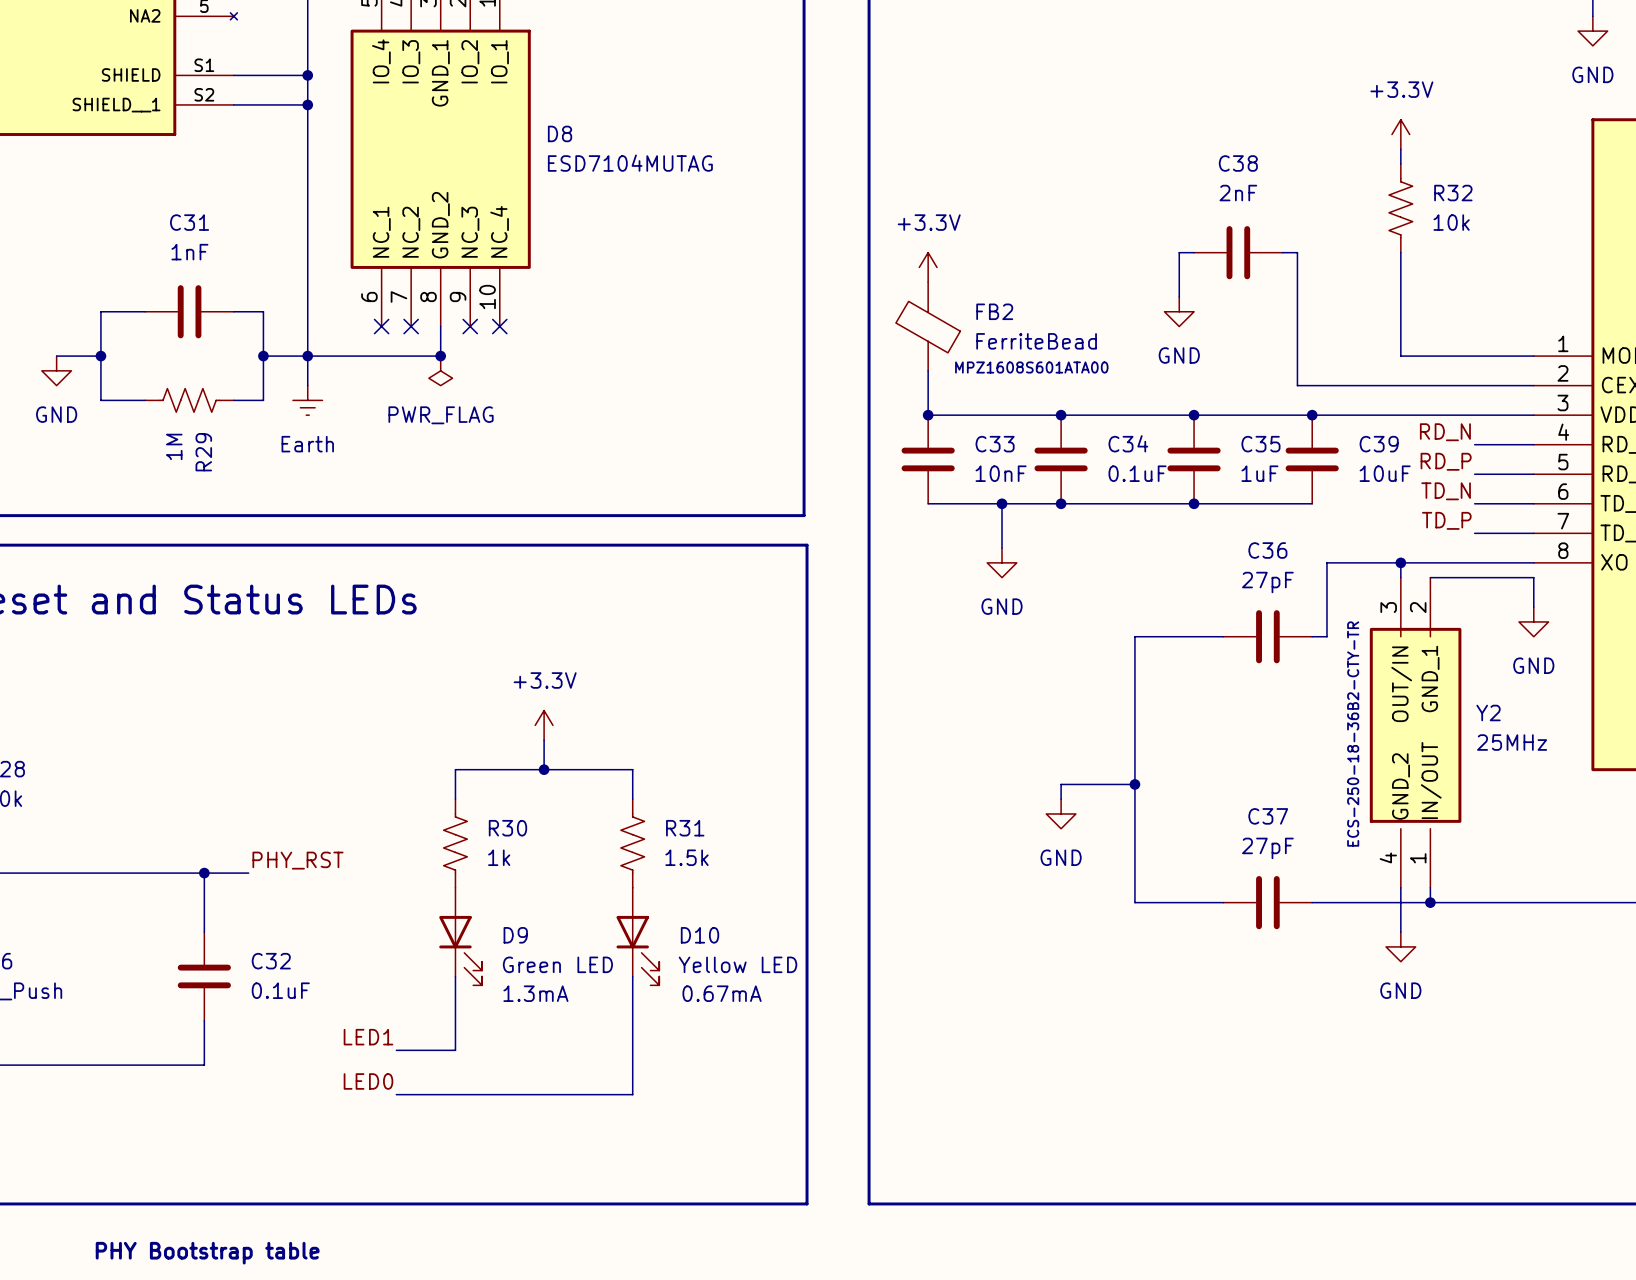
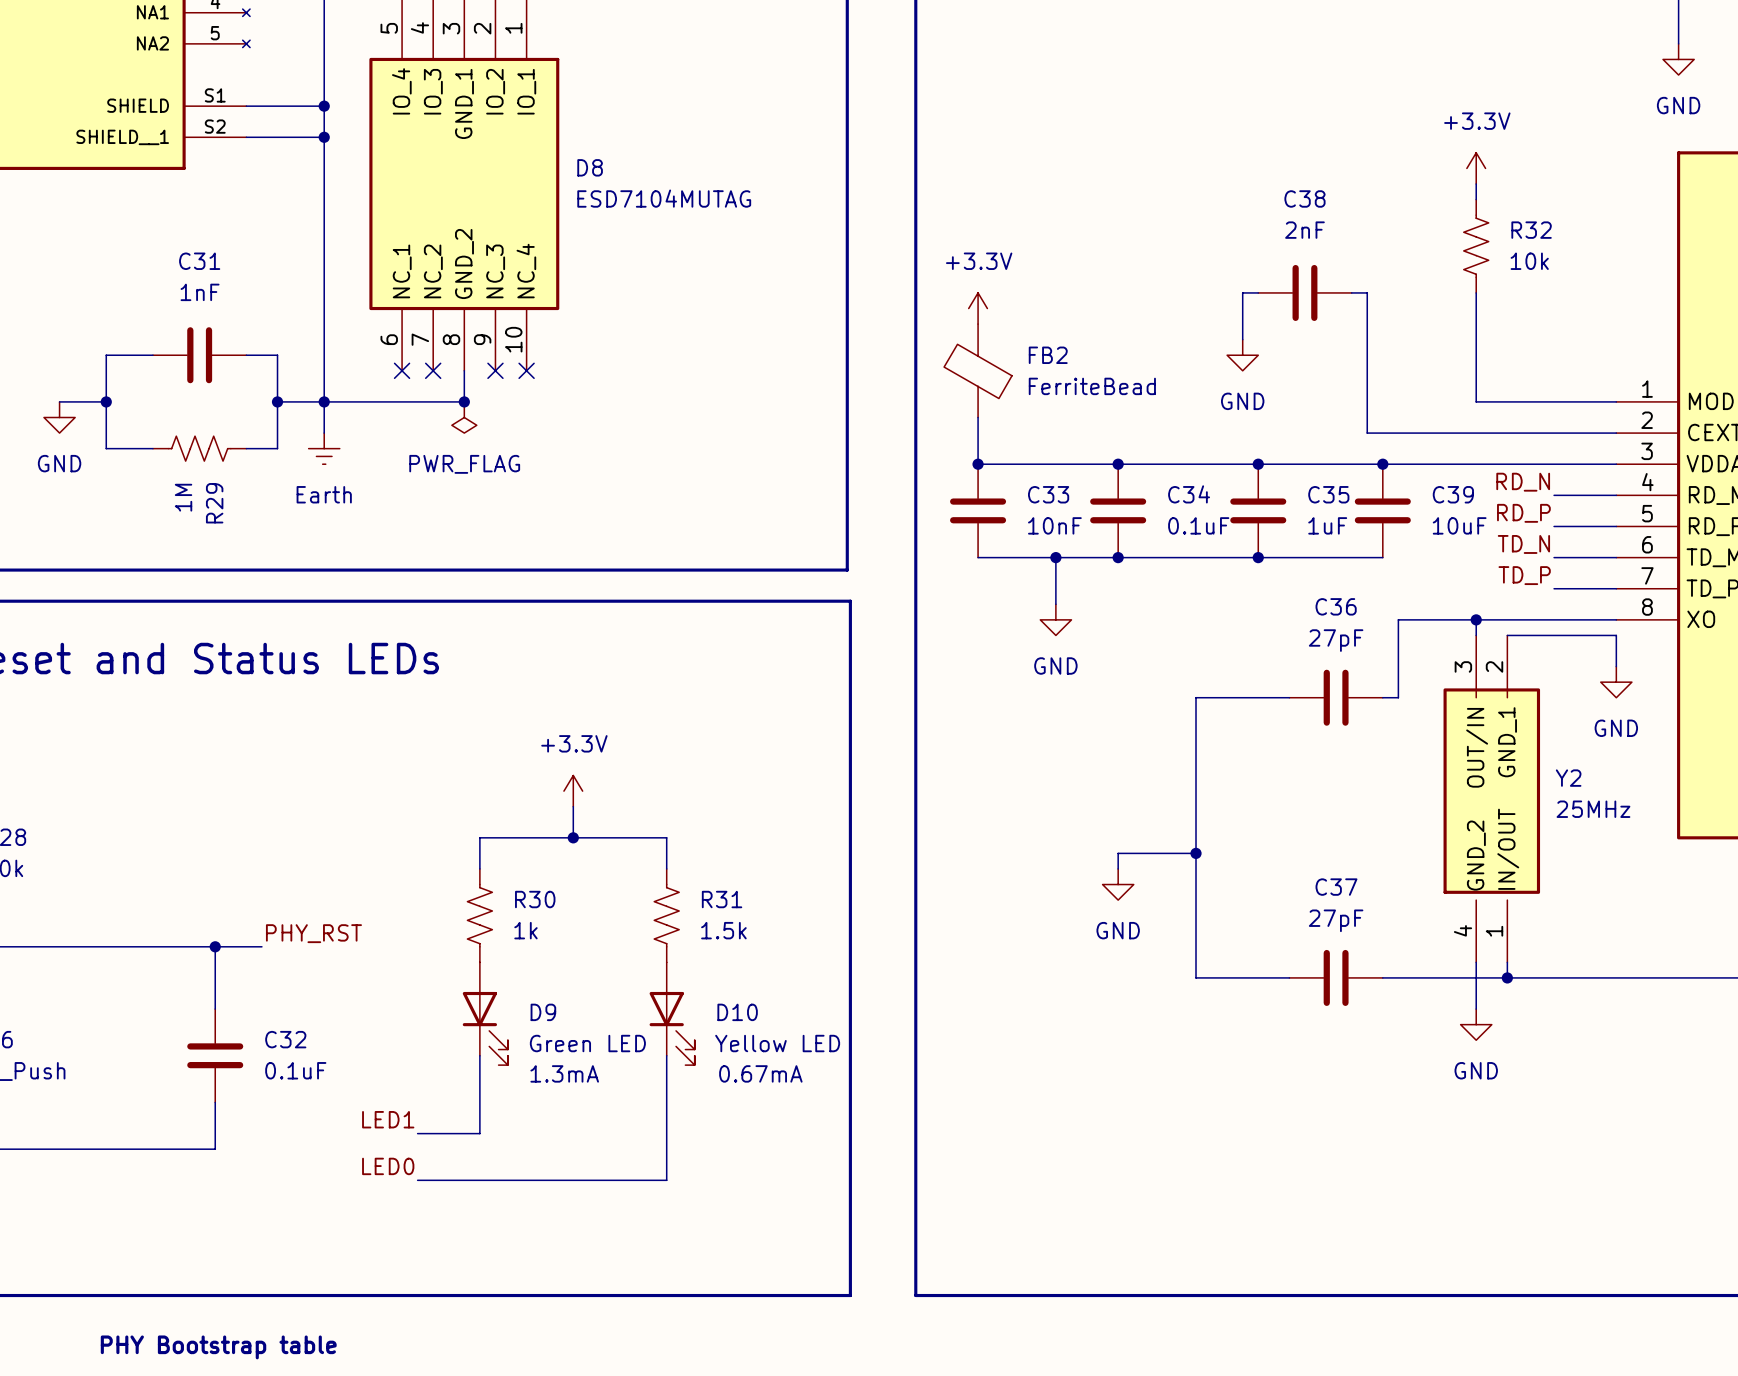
FB2 text: MPZ1608S601ATA00 (1031, 367) -> none
text: ECS-250-18-36B2-CTY-TR (1353, 734) -> none

